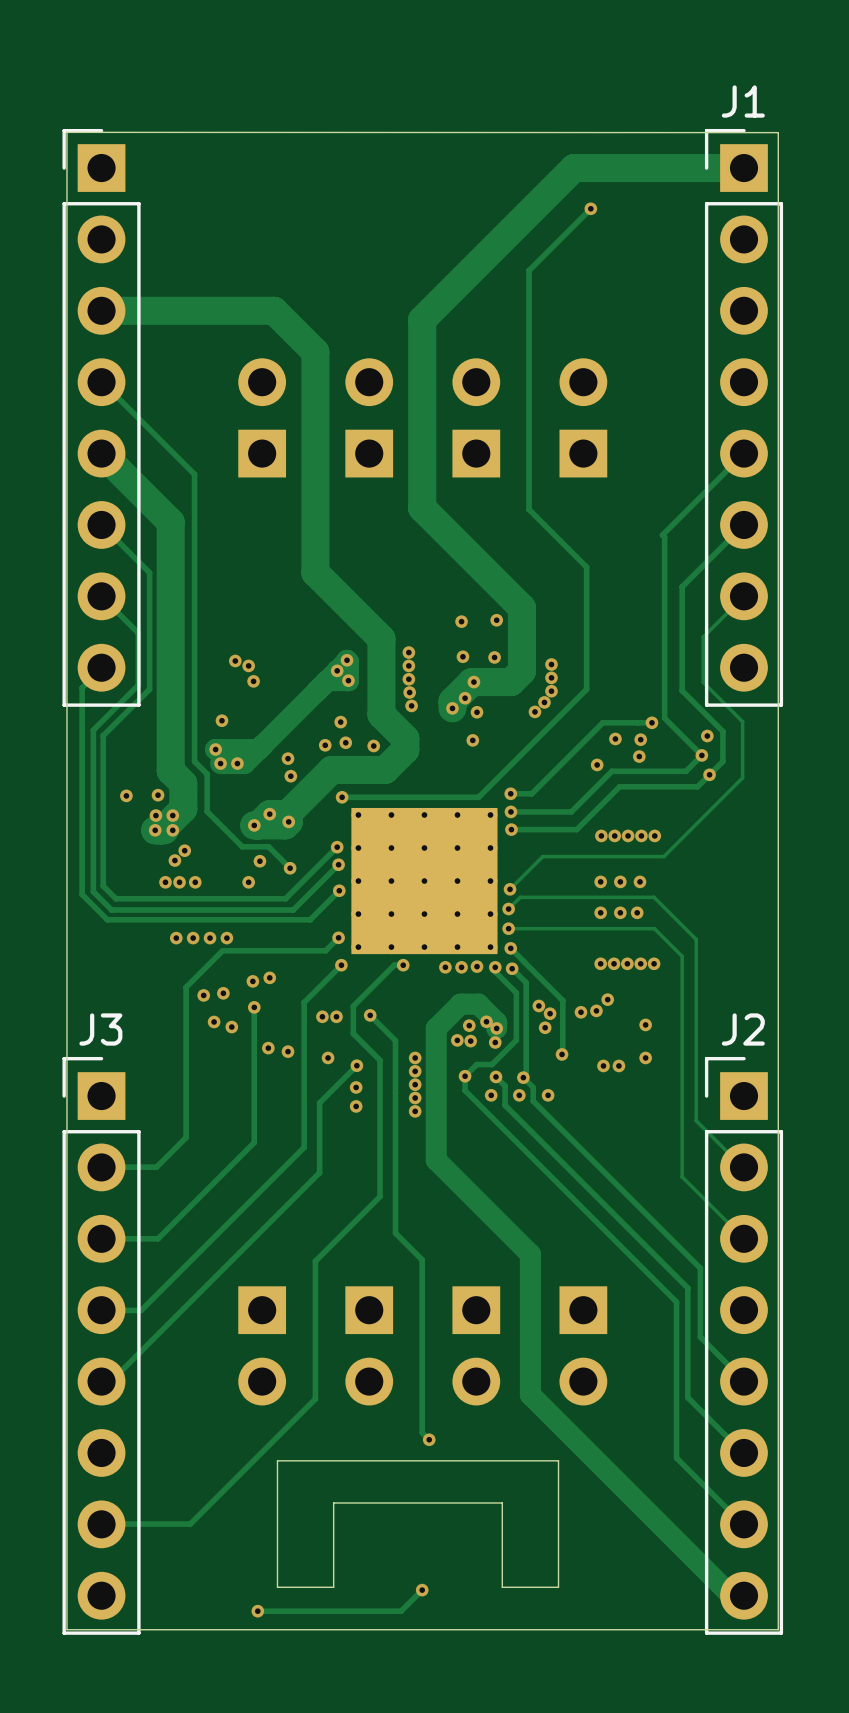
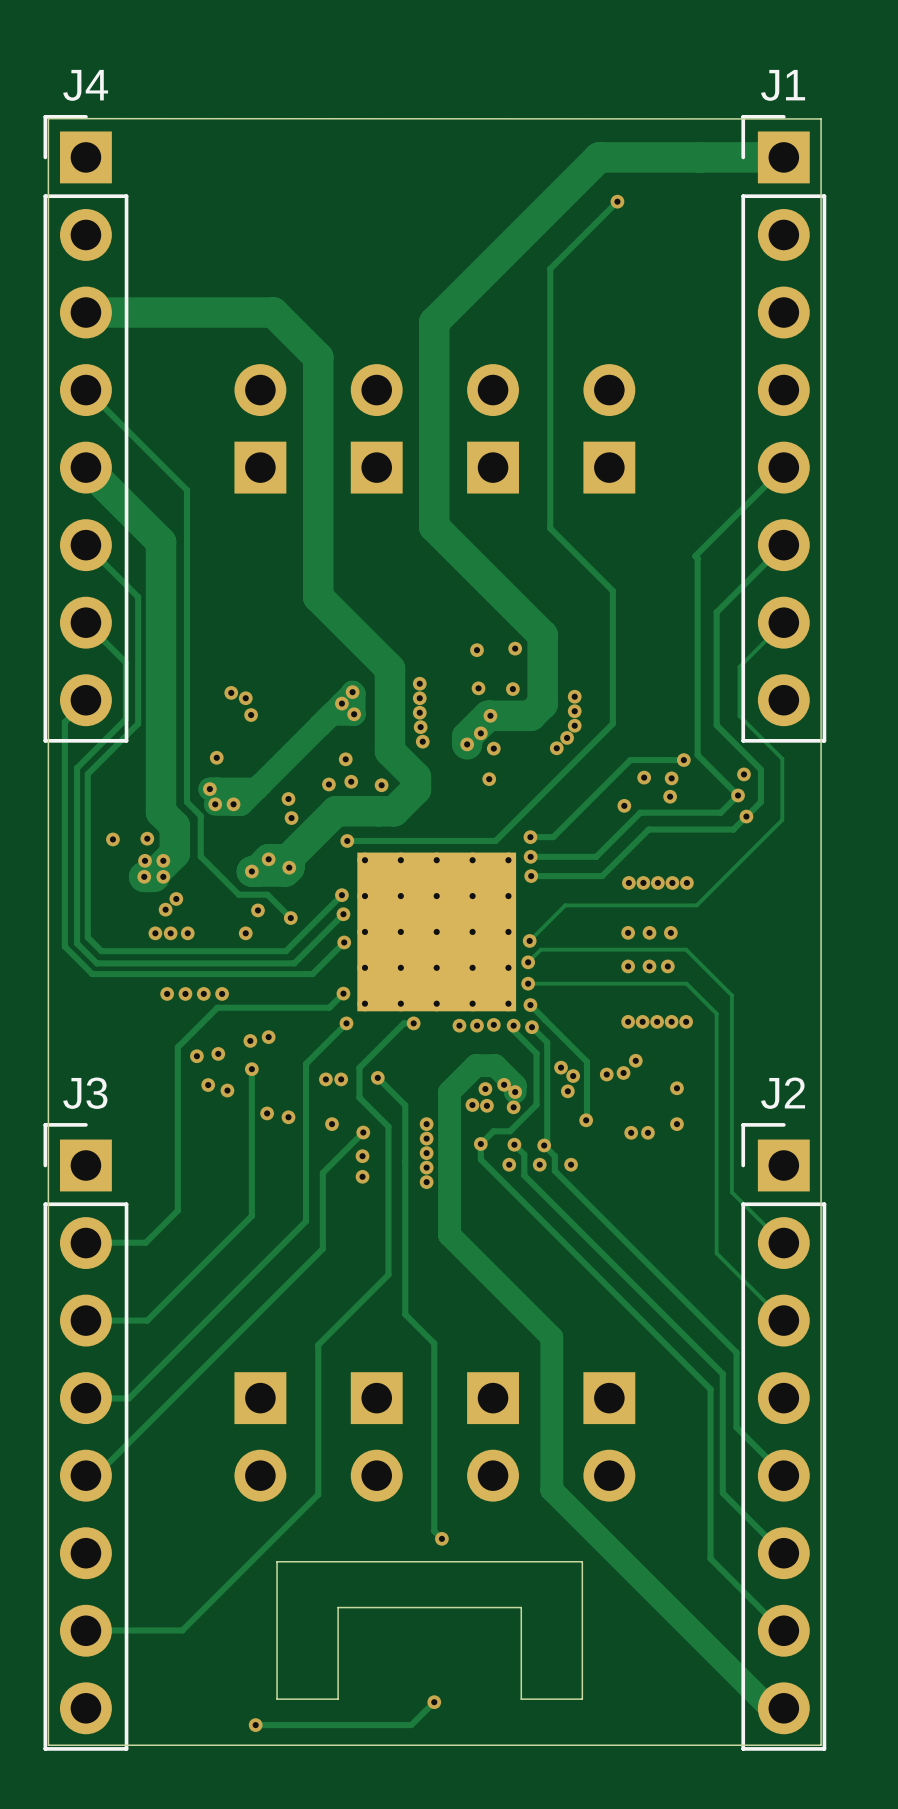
J4 name: none -> J4 (85, 85)

